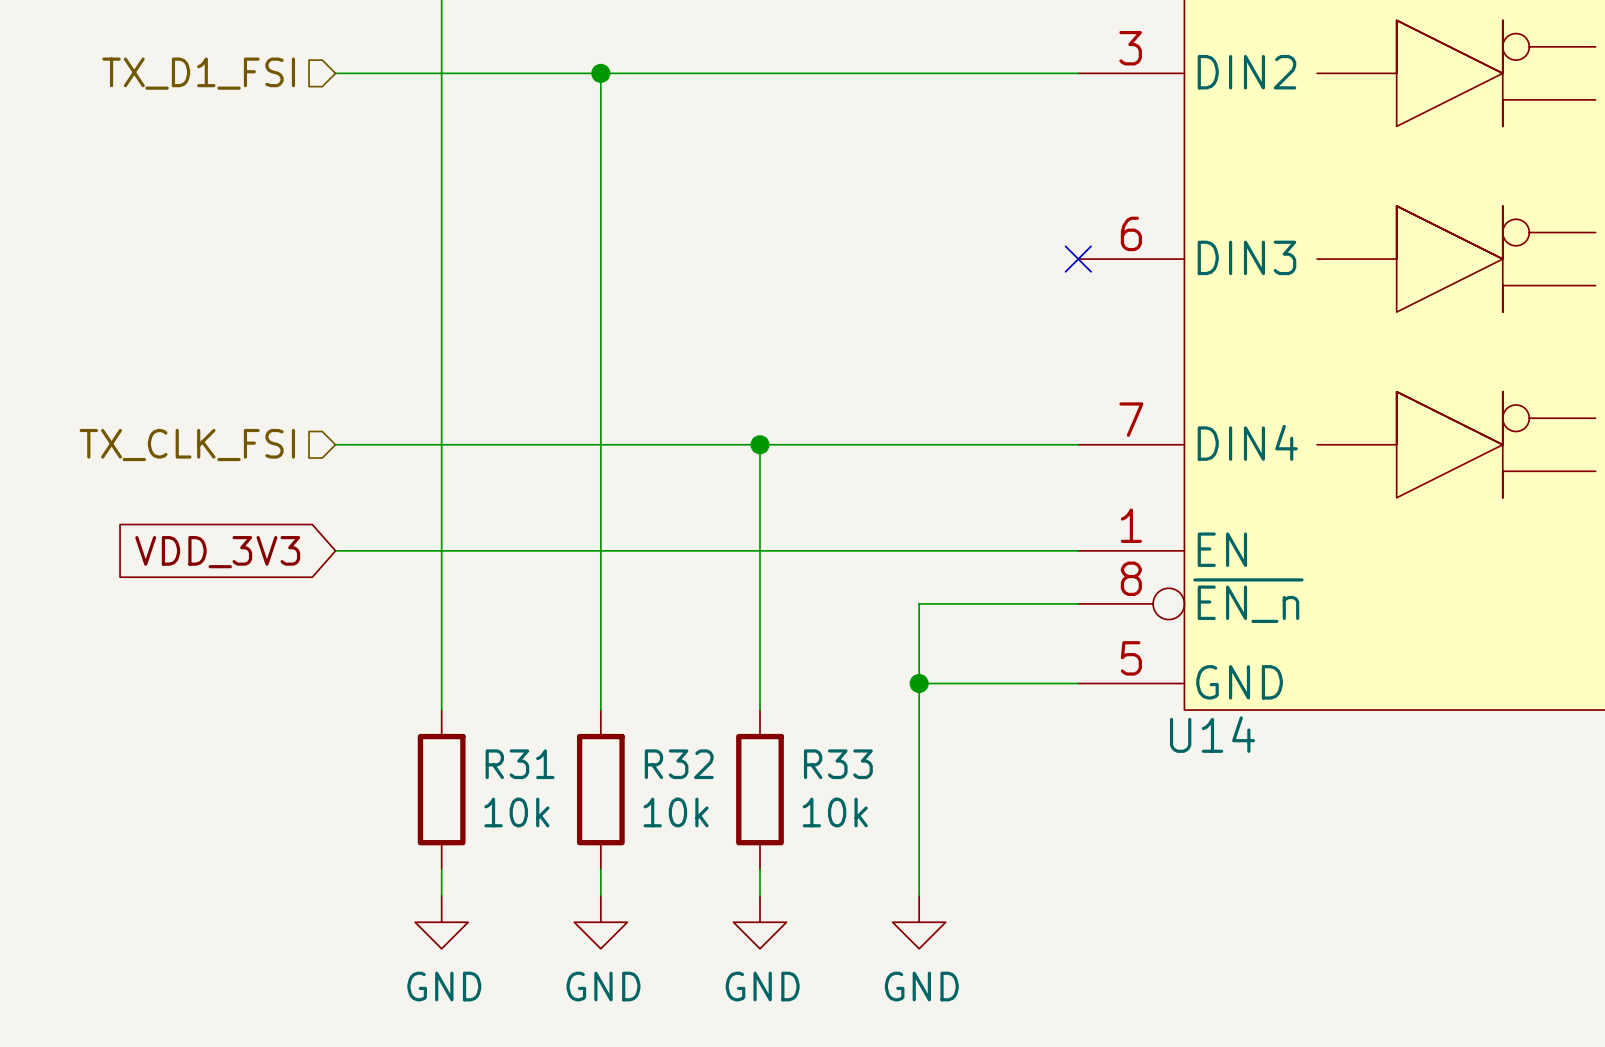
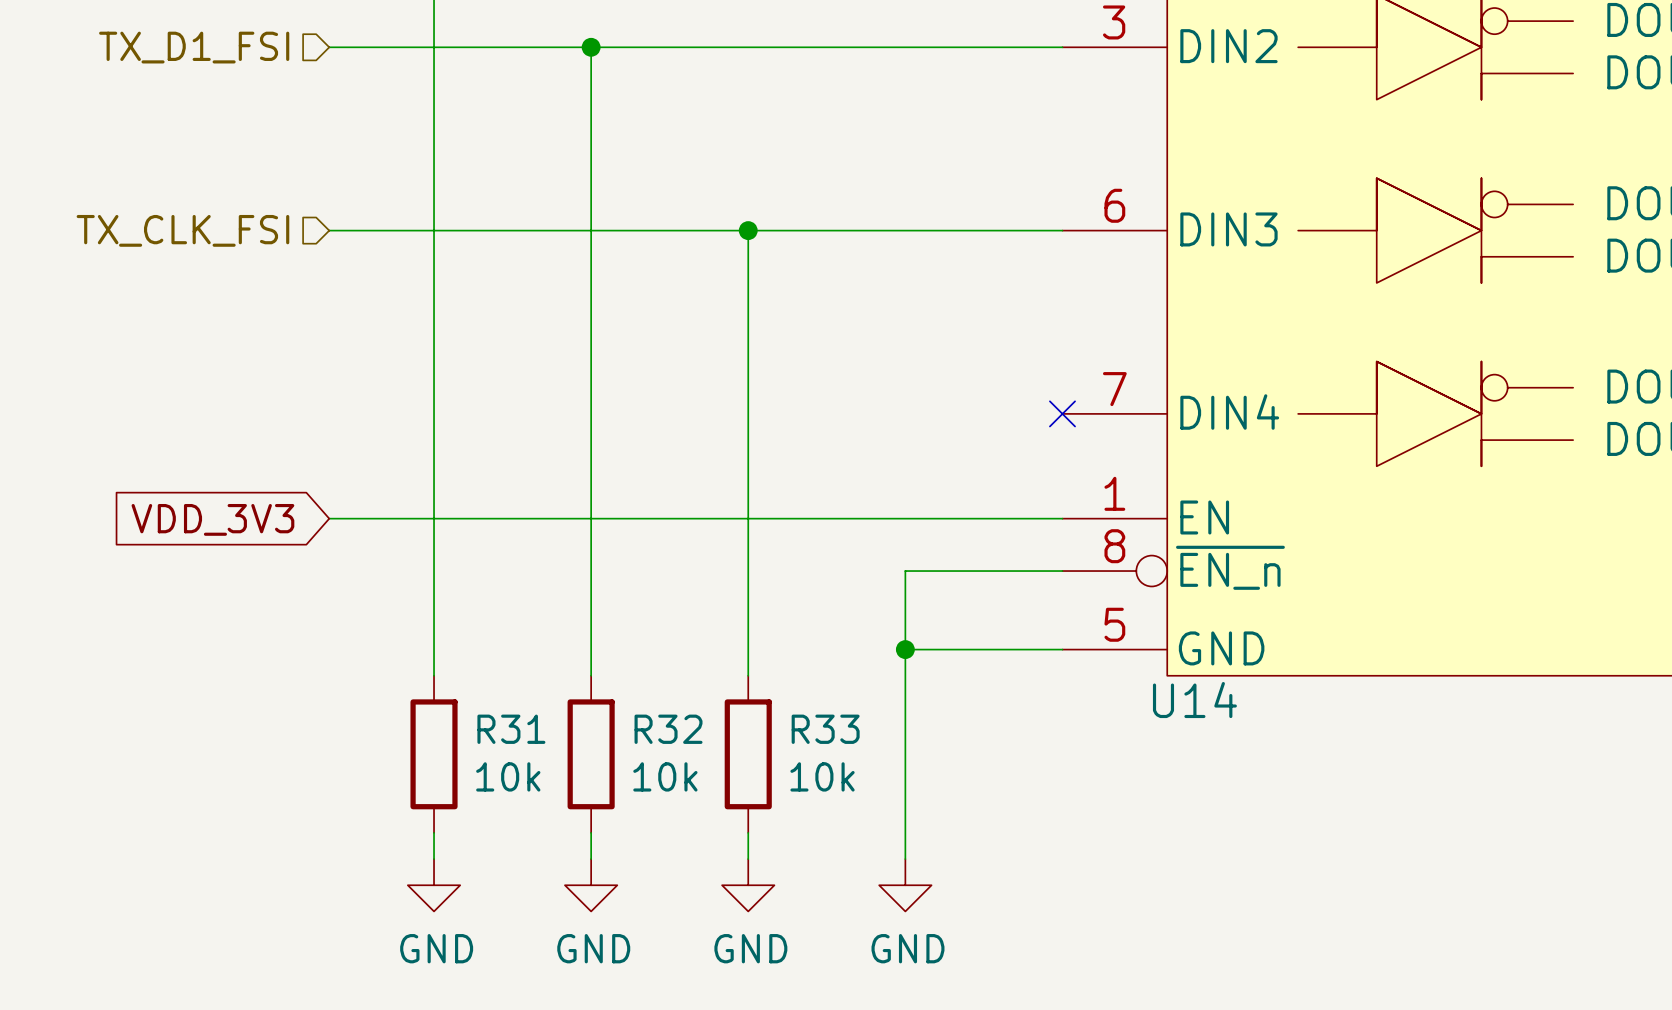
wire: none -> (748, 230) (748, 413)
junction: none -> (748, 230)
no-connect mark: (1078, 259) -> none
wire: (335, 444) (1078, 444) -> (329, 230) (1062, 230)
junction: (759, 444) -> none
no-connect mark: none -> (1062, 413)
hierarchical label position: TX_CLK_FSI (187, 445) -> TX_CLK_FSI (182, 230)

